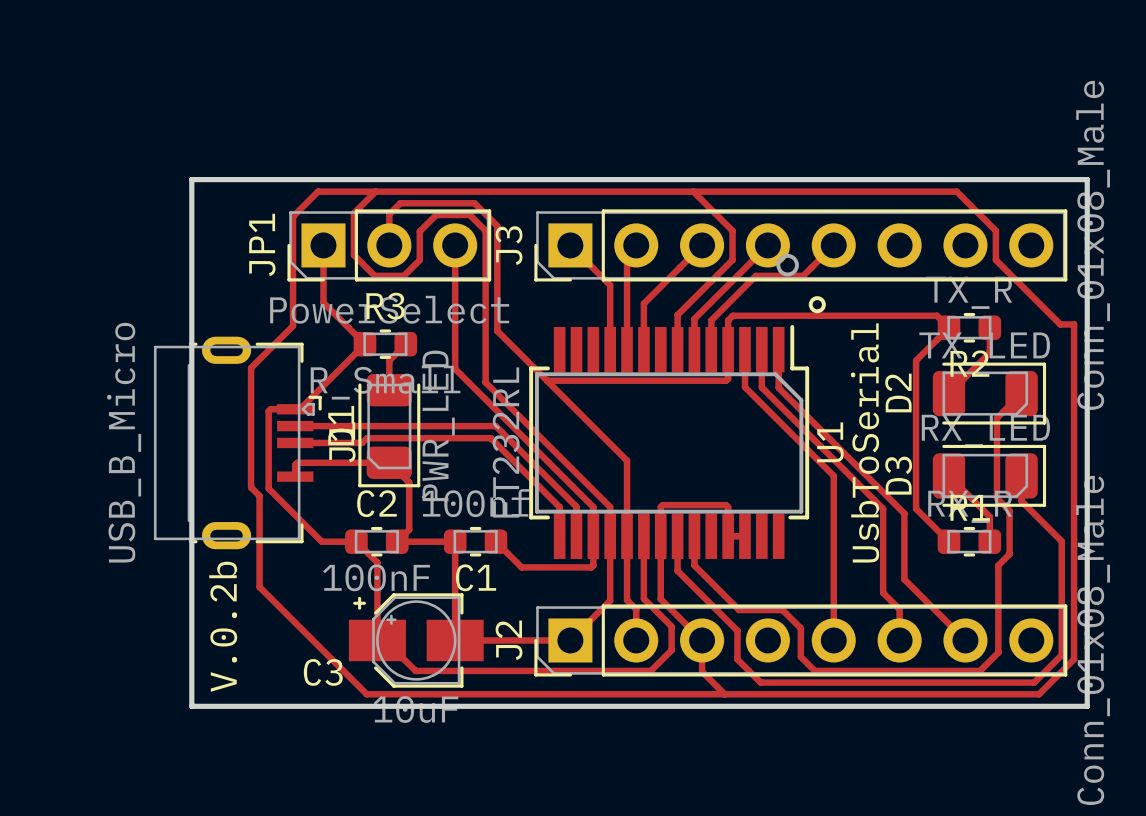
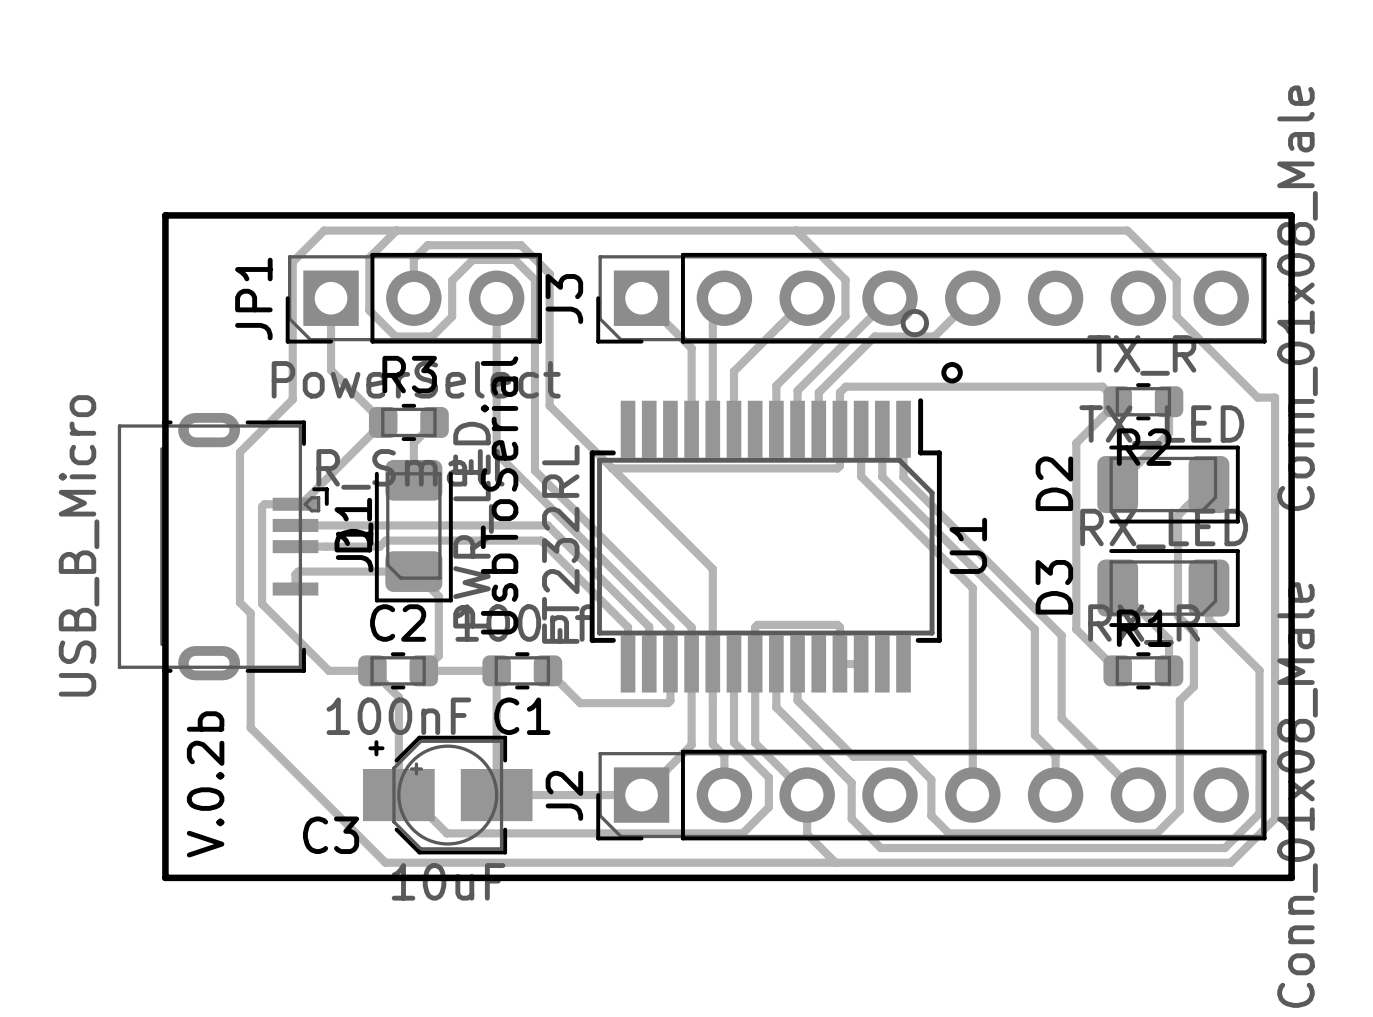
text position: UsbToSerial (865, 442) -> UsbToSerial (499, 495)

